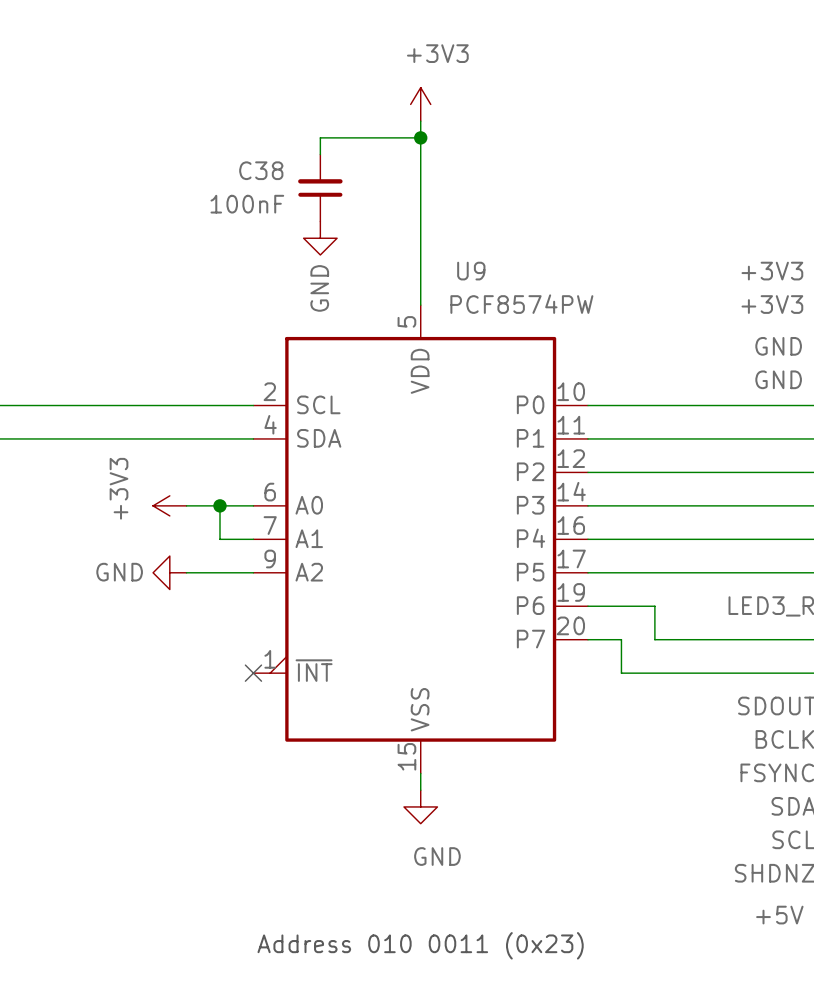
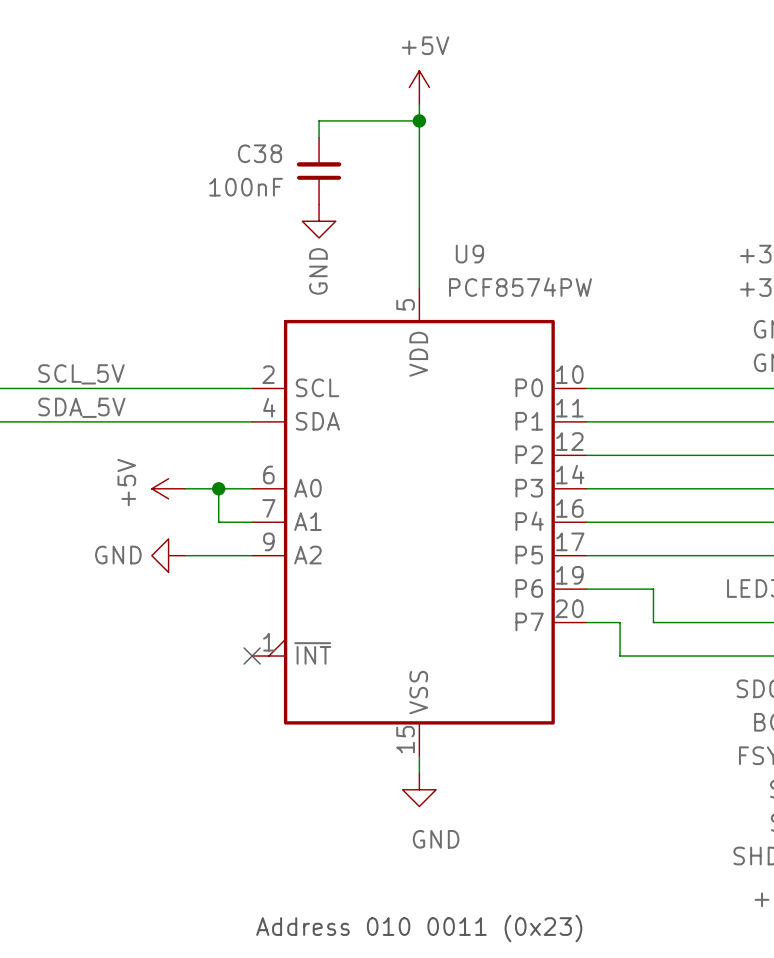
power symbol: +3V3 (420, 104) -> +5V (419, 87)
label: none -> SCL_5V (81, 374)
label: none -> SDA_5V (81, 407)
power symbol: +3V3 (169, 505) -> +5V (168, 488)

